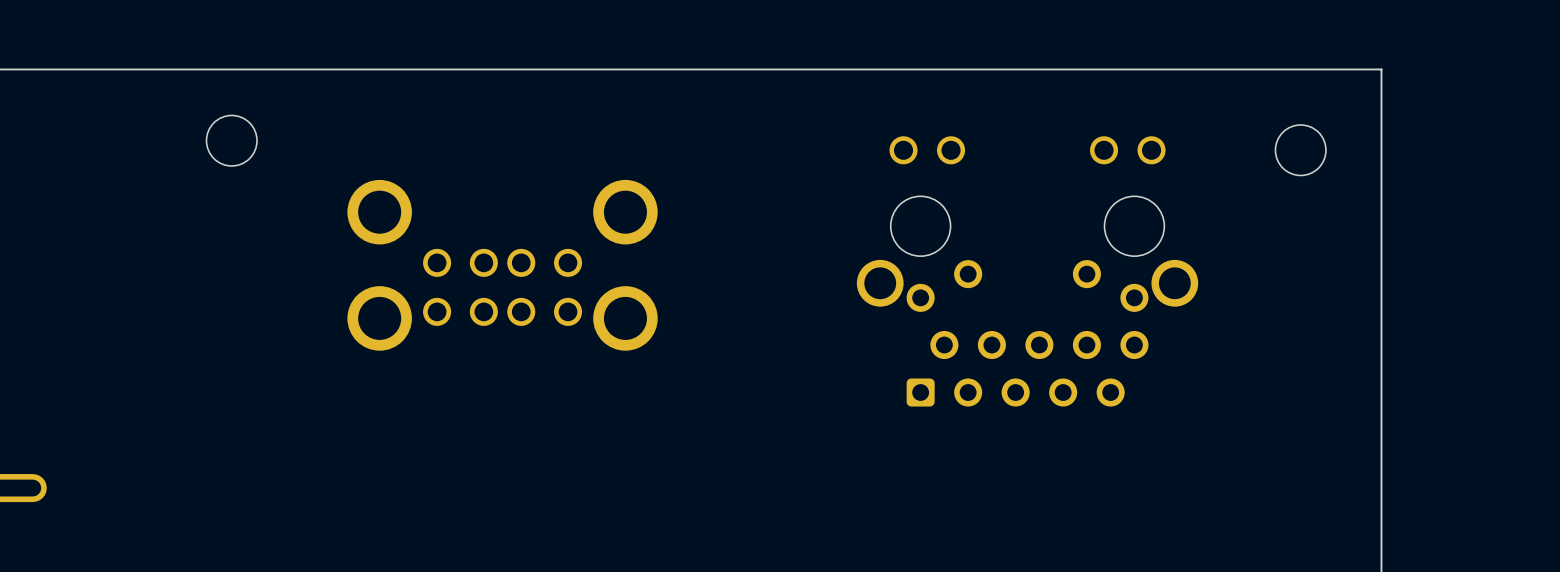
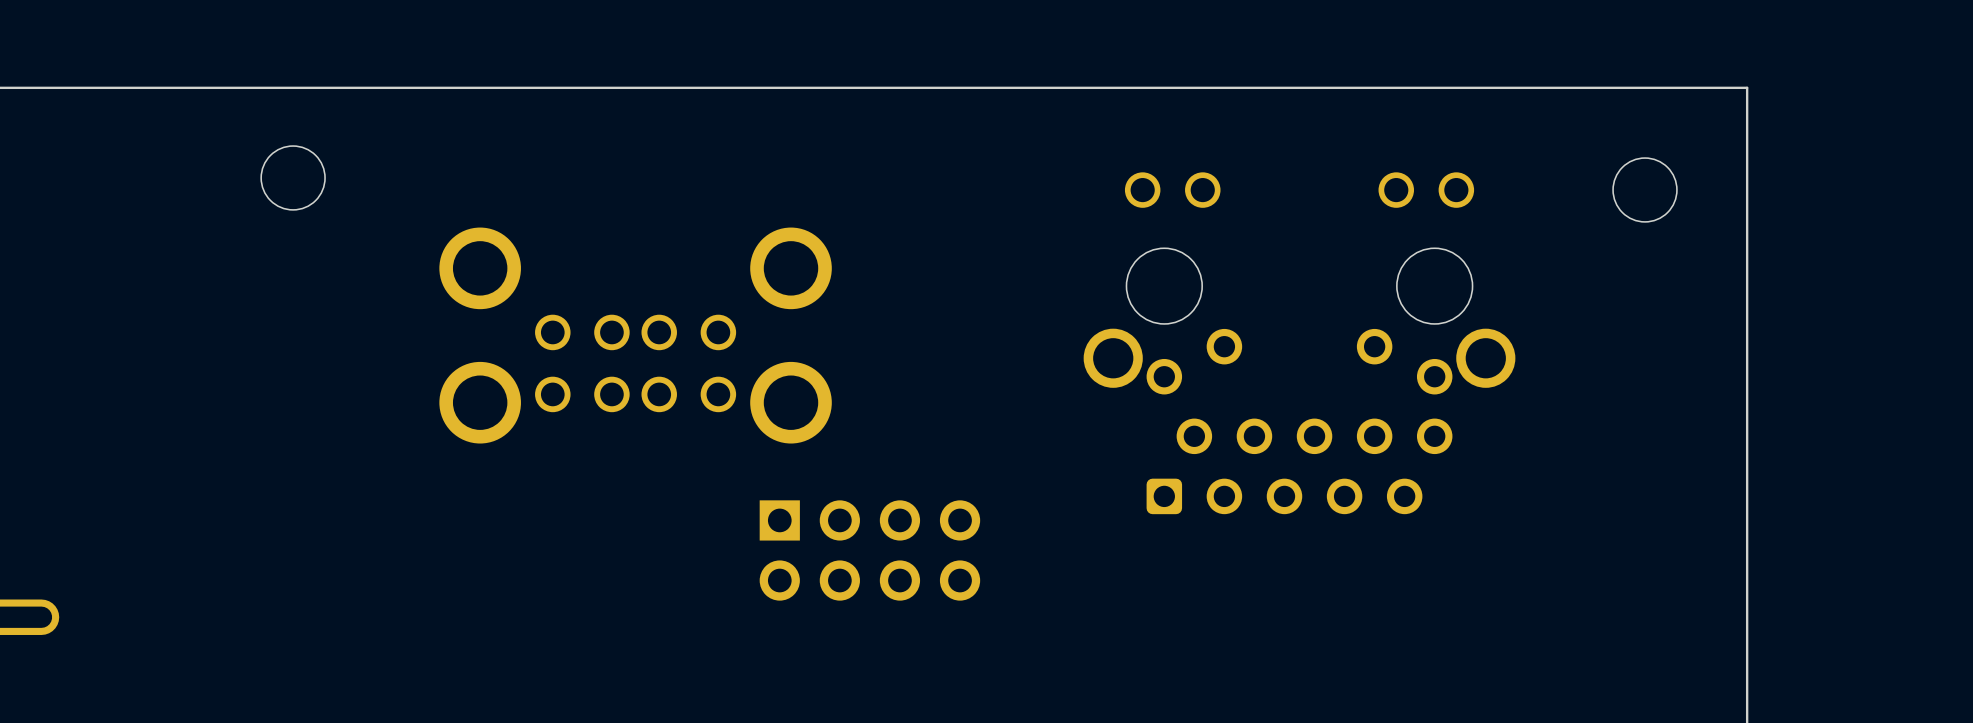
part: none -> (869, 550)

